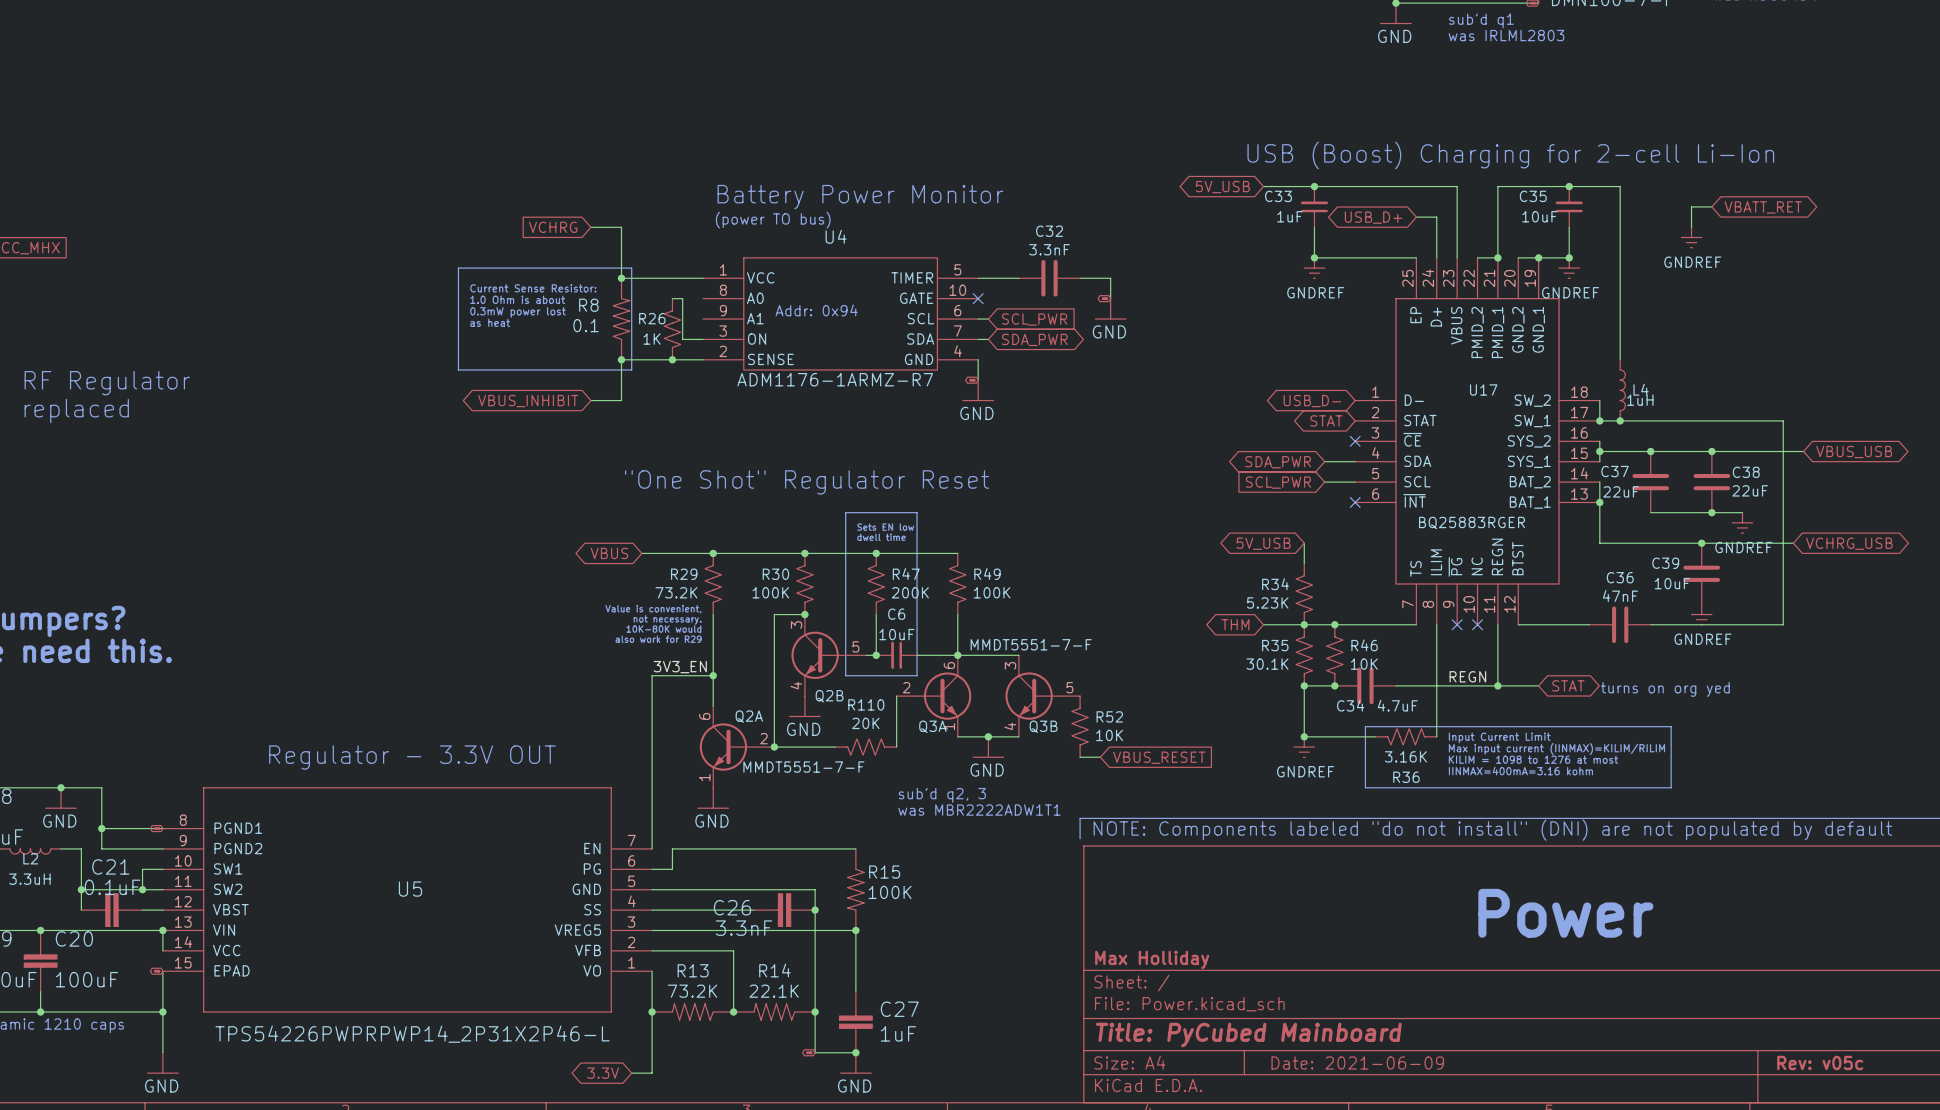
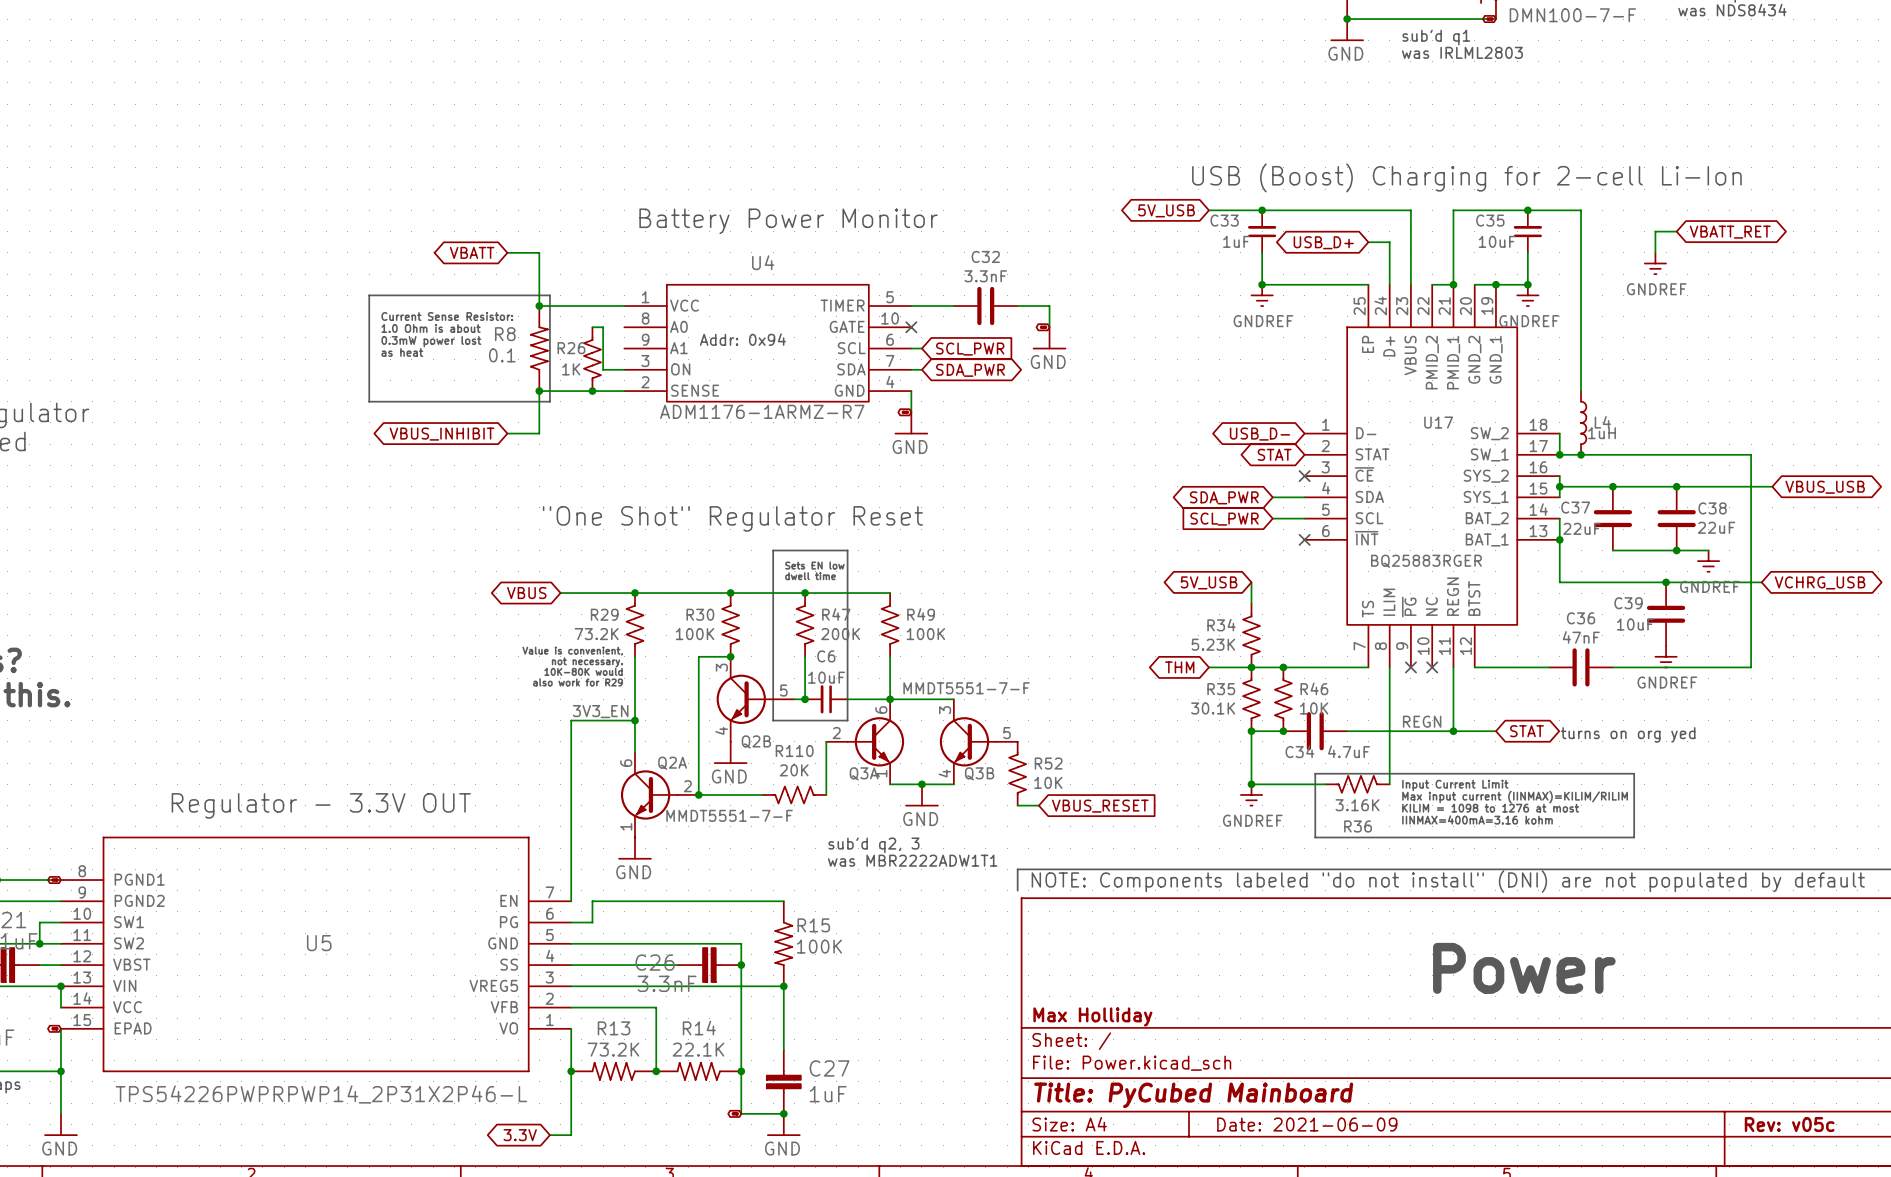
text: (power TO bus) (773, 220) -> none
global label shape: input (553, 227) -> bidirectional (472, 252)
global label: VCHRG (553, 227) -> VBATT (472, 252)

